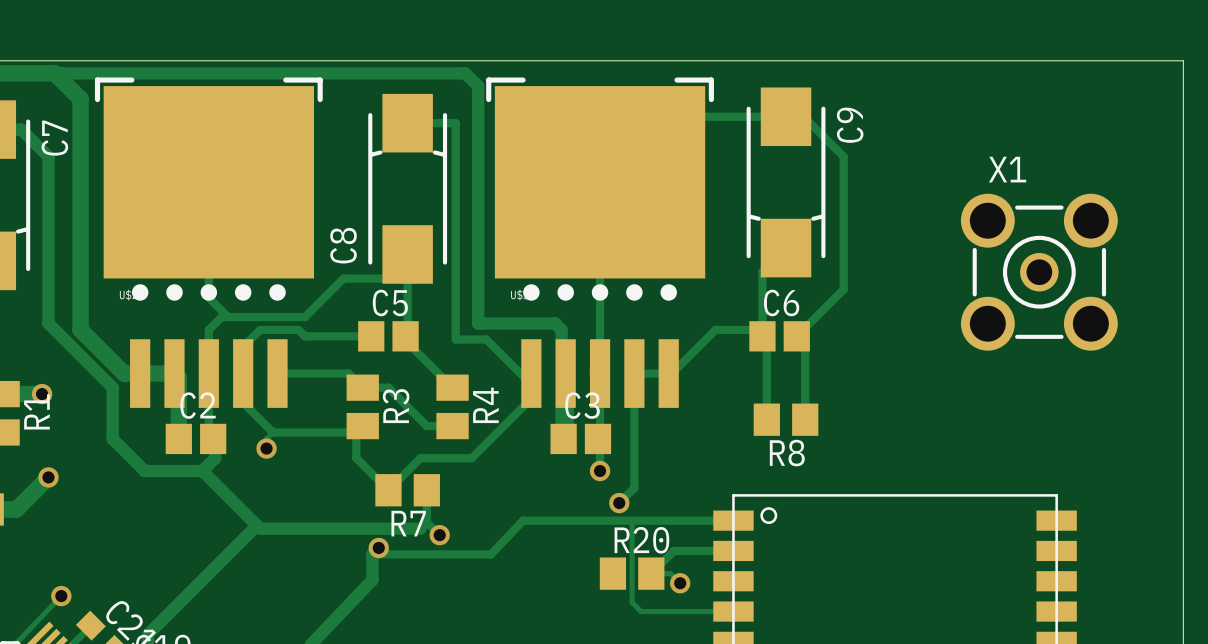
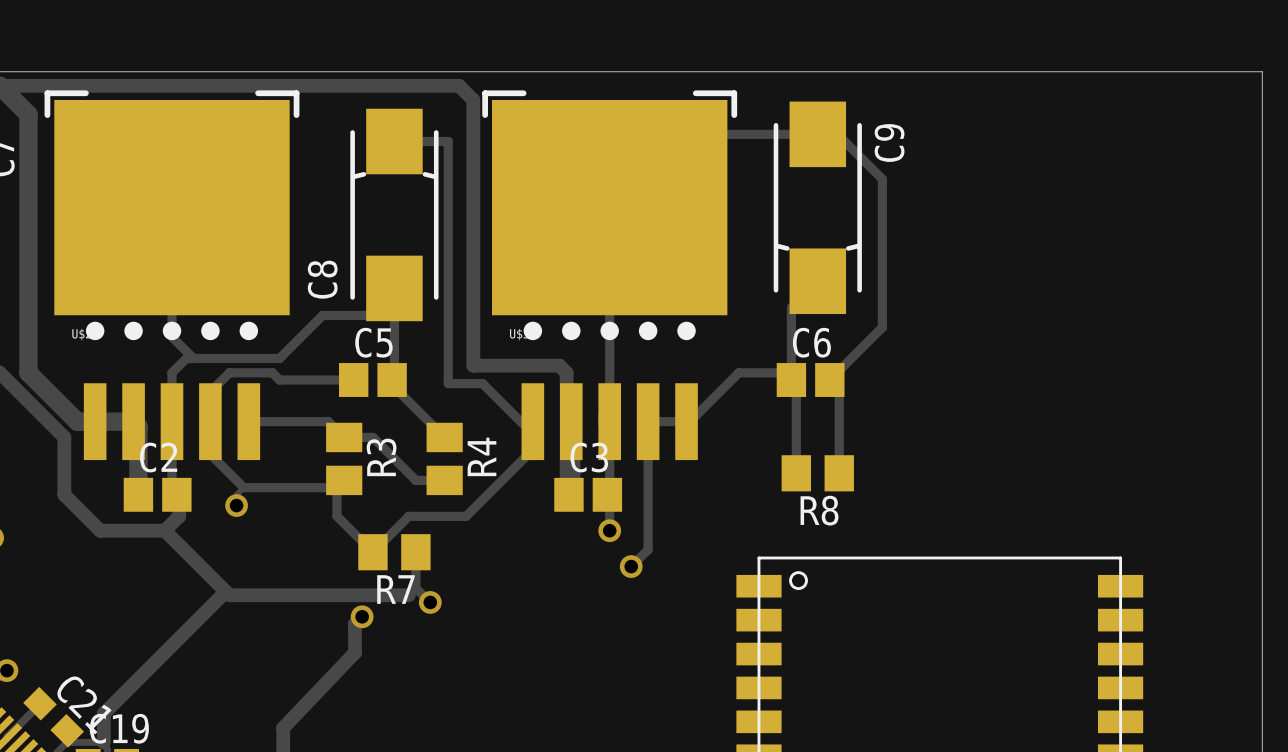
X1: (1039, 272) -> none
track: (635, 520) (632, 523) (632, 602) (641, 611) (733, 611) -> none
track: (733, 520) (523, 520) (491, 554) (378, 554) (378, 547) -> none
track: (733, 550) (673, 550) (651, 573) (670, 573) (680, 583) -> none
R20: (632, 573) -> none
via: (680, 583) -> none

